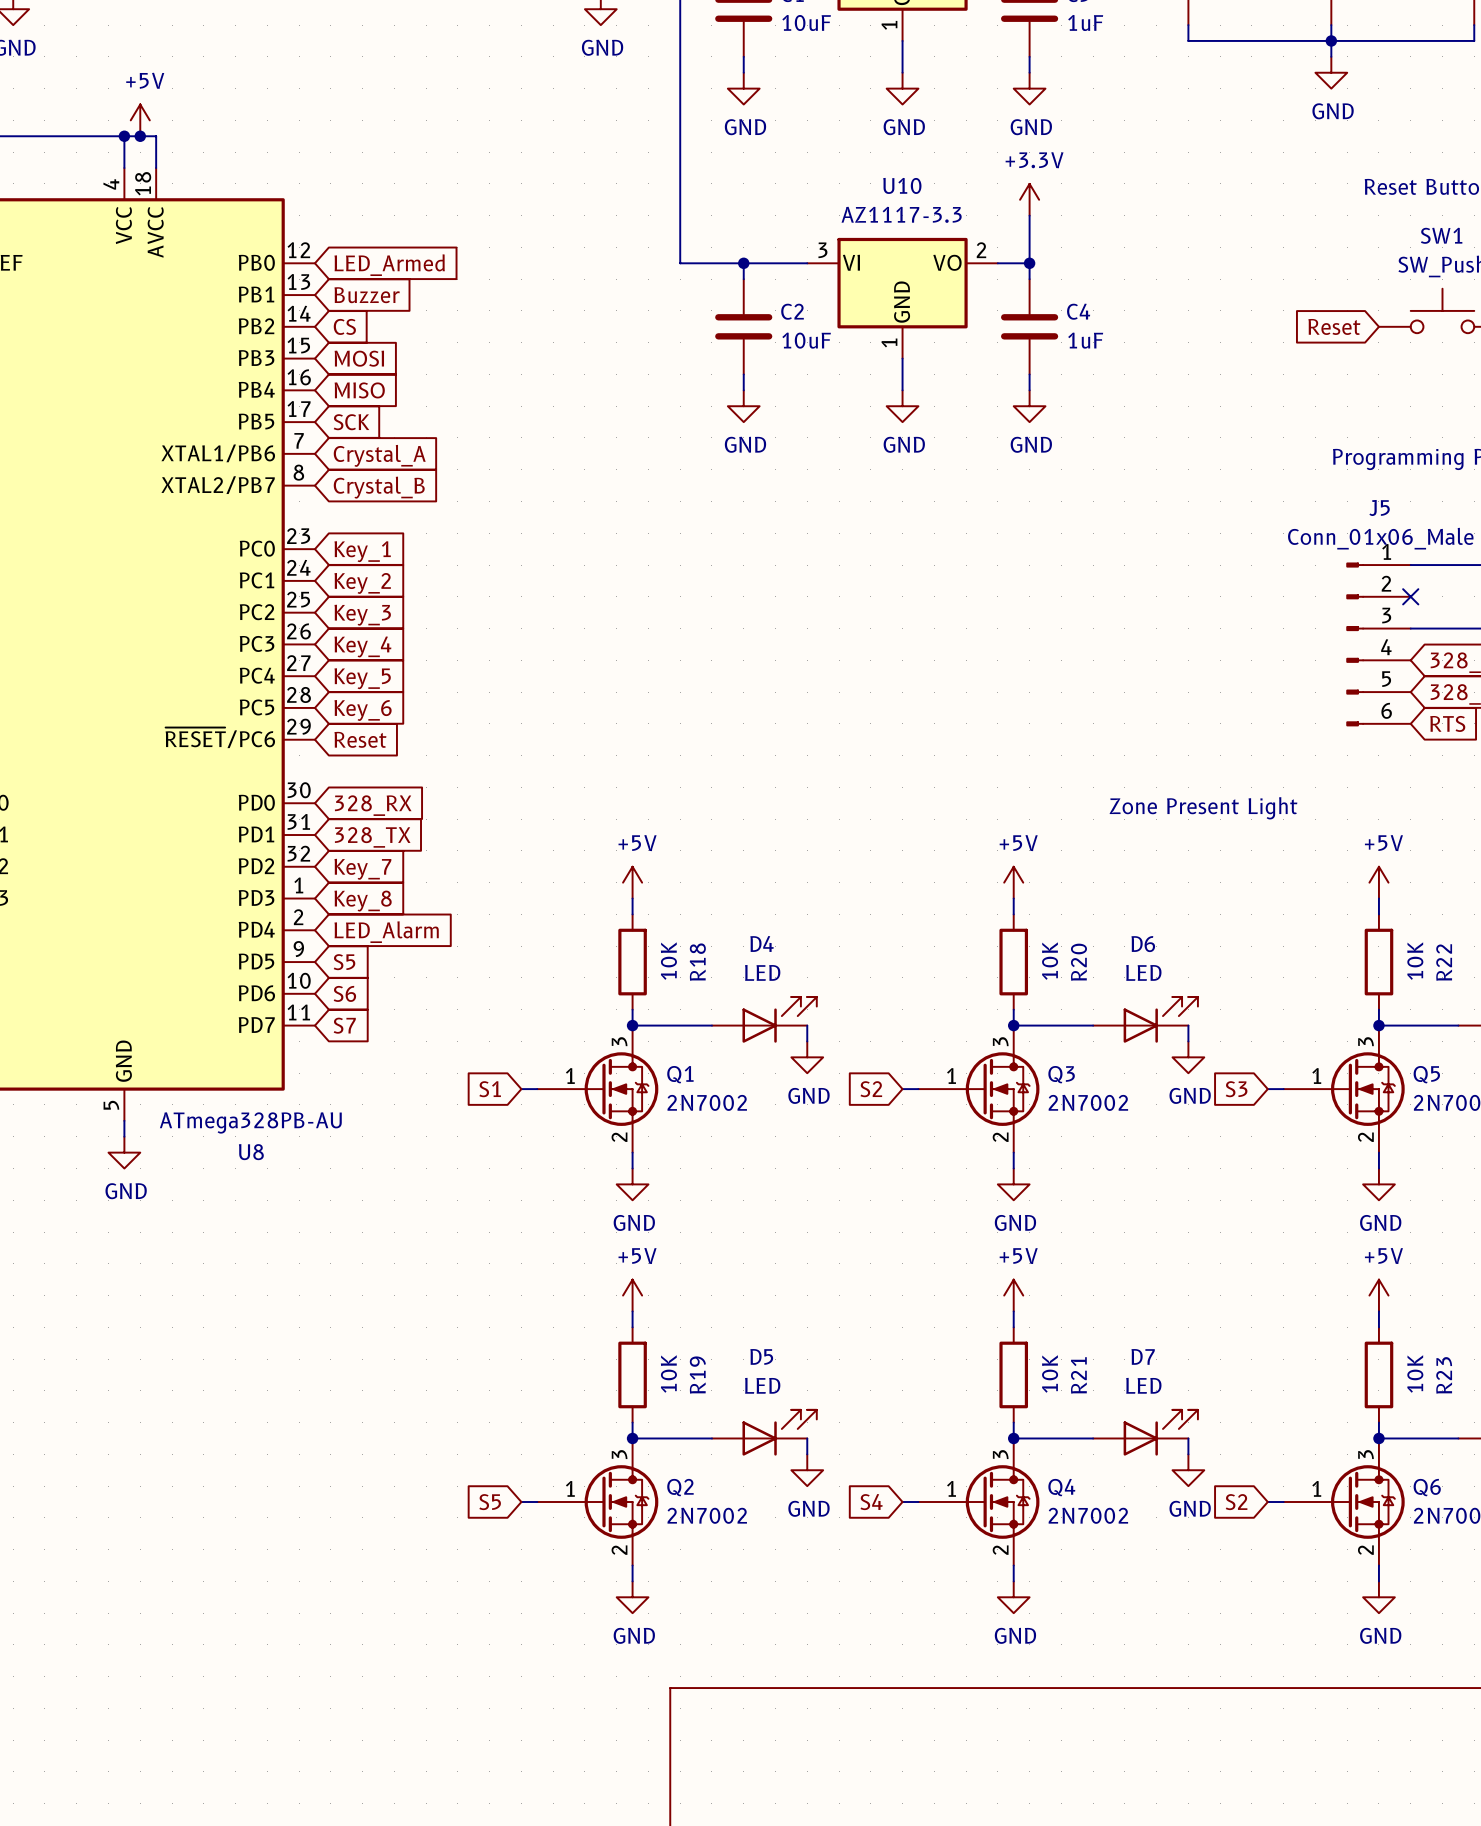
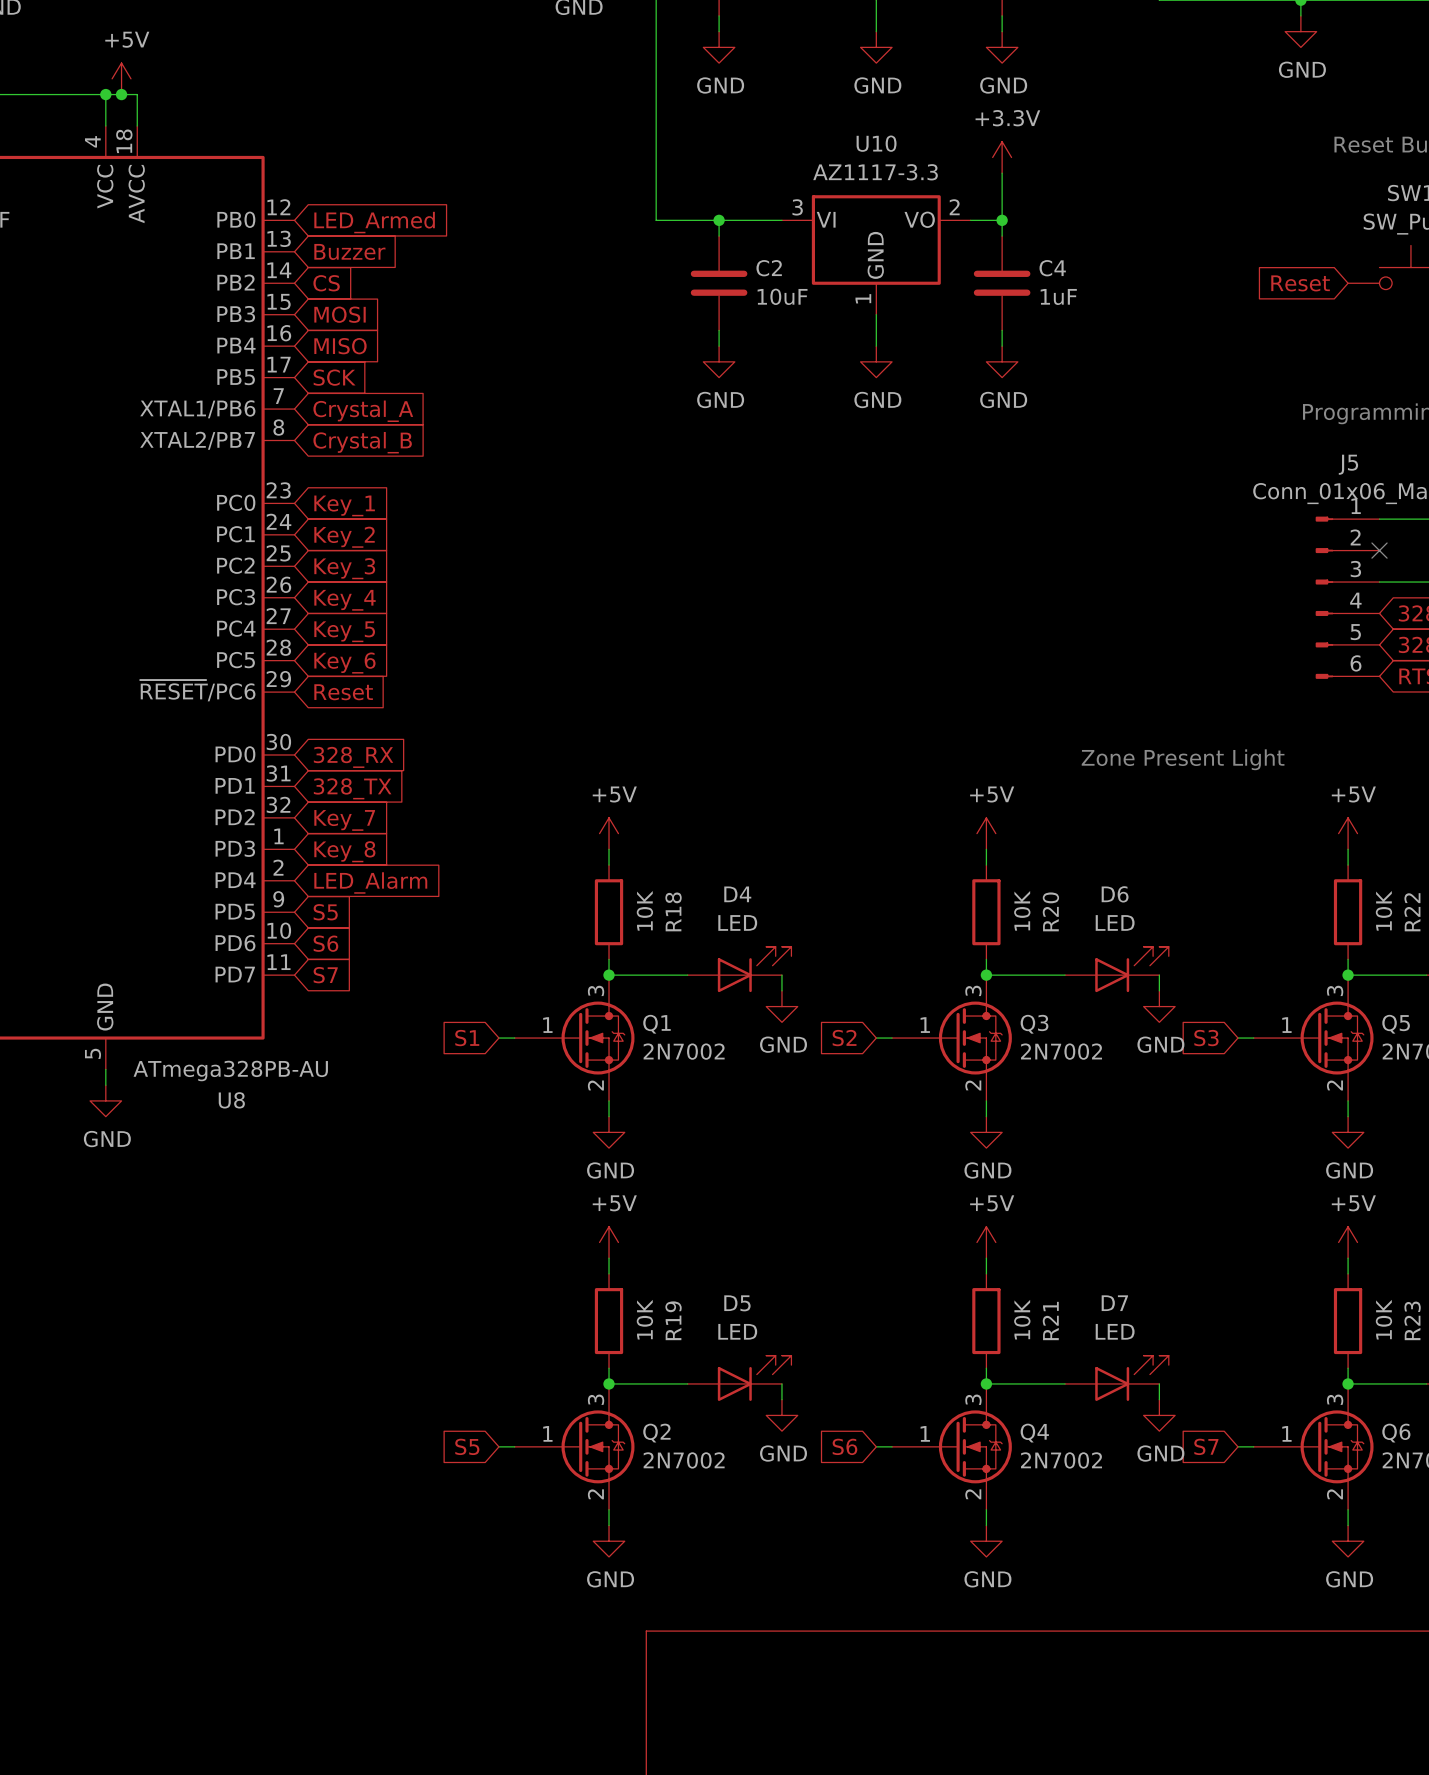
global label: S4 (871, 1502) -> S6 (844, 1446)
global label: S2 (1236, 1502) -> S7 (1206, 1446)

